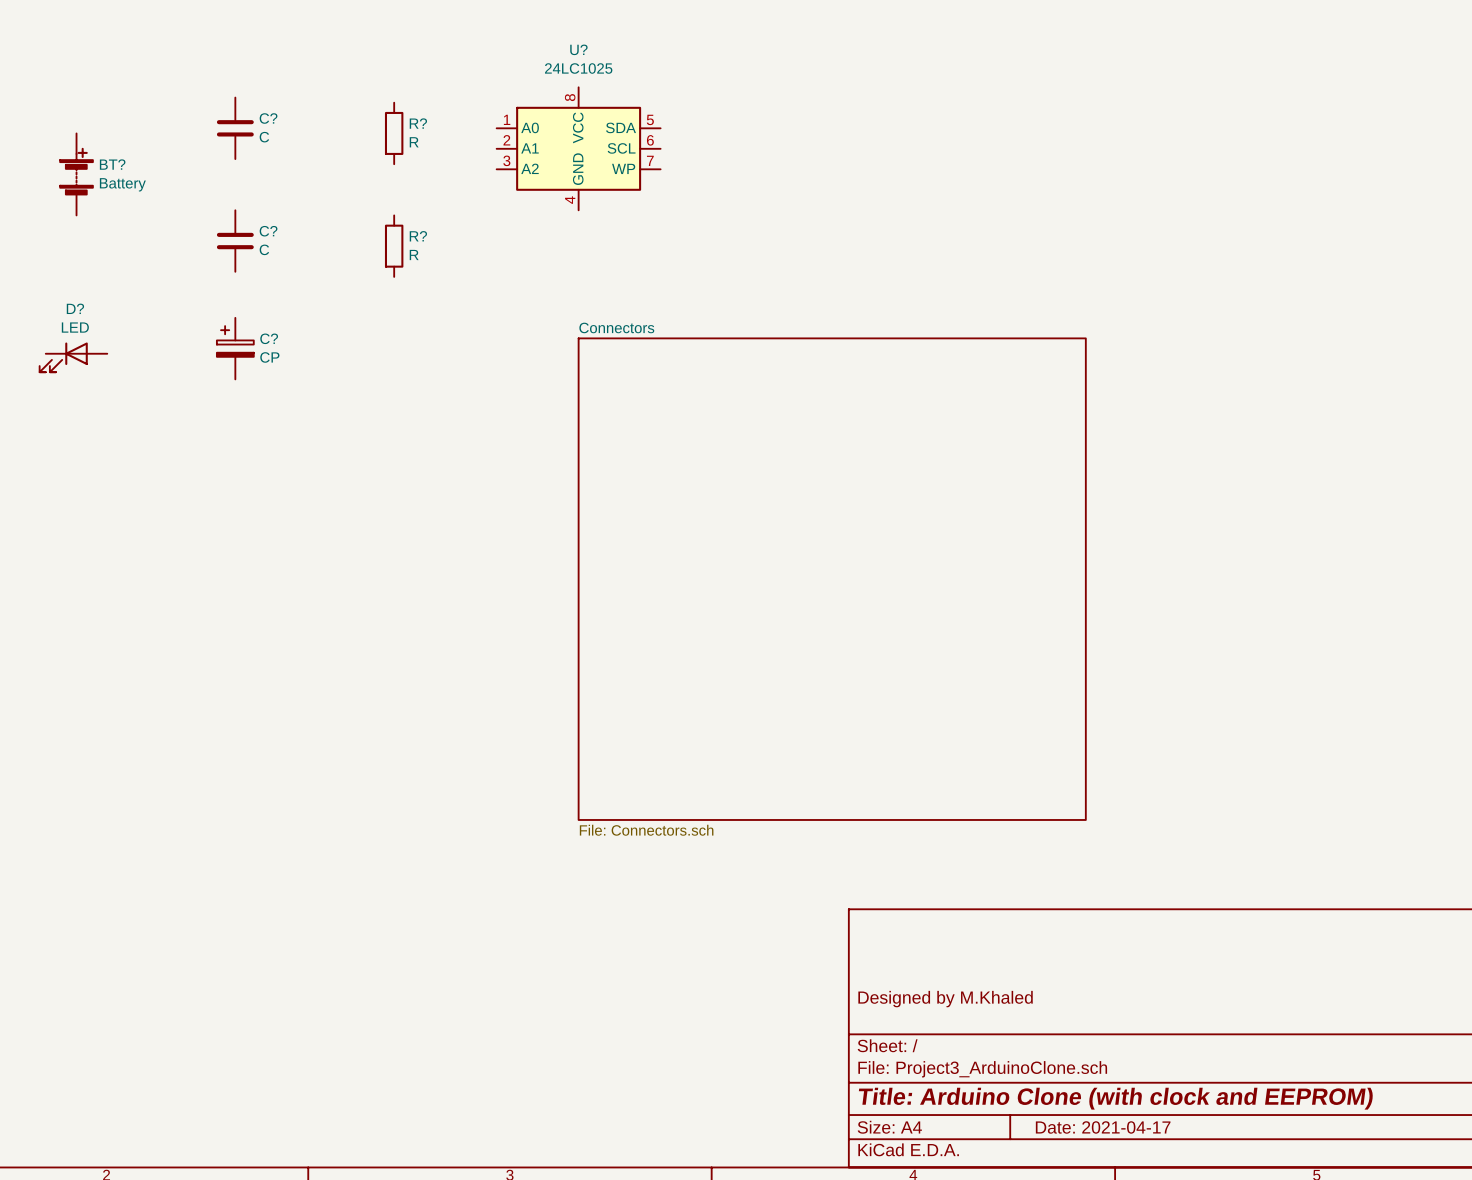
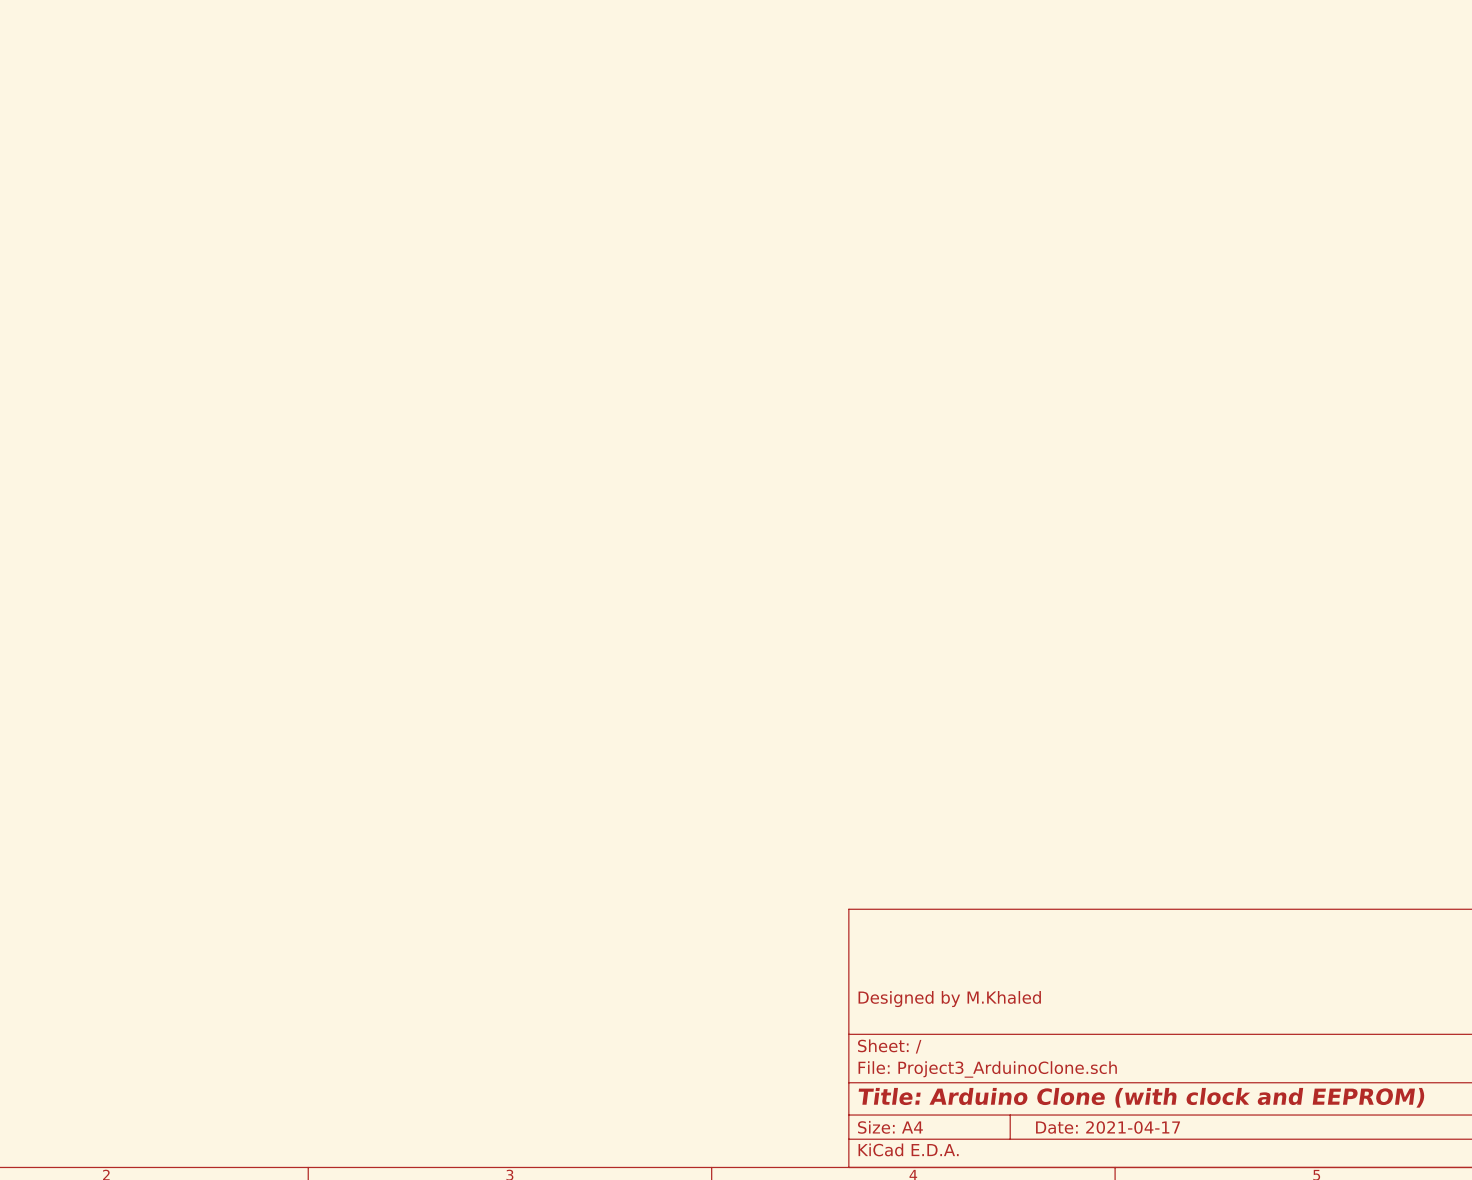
C?: C (235, 128) -> none
R?: R (394, 133) -> none
U?: 24LC1025 (578, 148) -> none
BT?: Battery (76, 174) -> none
C?: C (235, 241) -> none
R?: R (394, 246) -> none
C?: CP (235, 348) -> none
D?: LED (73, 357) -> none
sheet Connectors: File: Connectors.sch (832, 579) -> none

